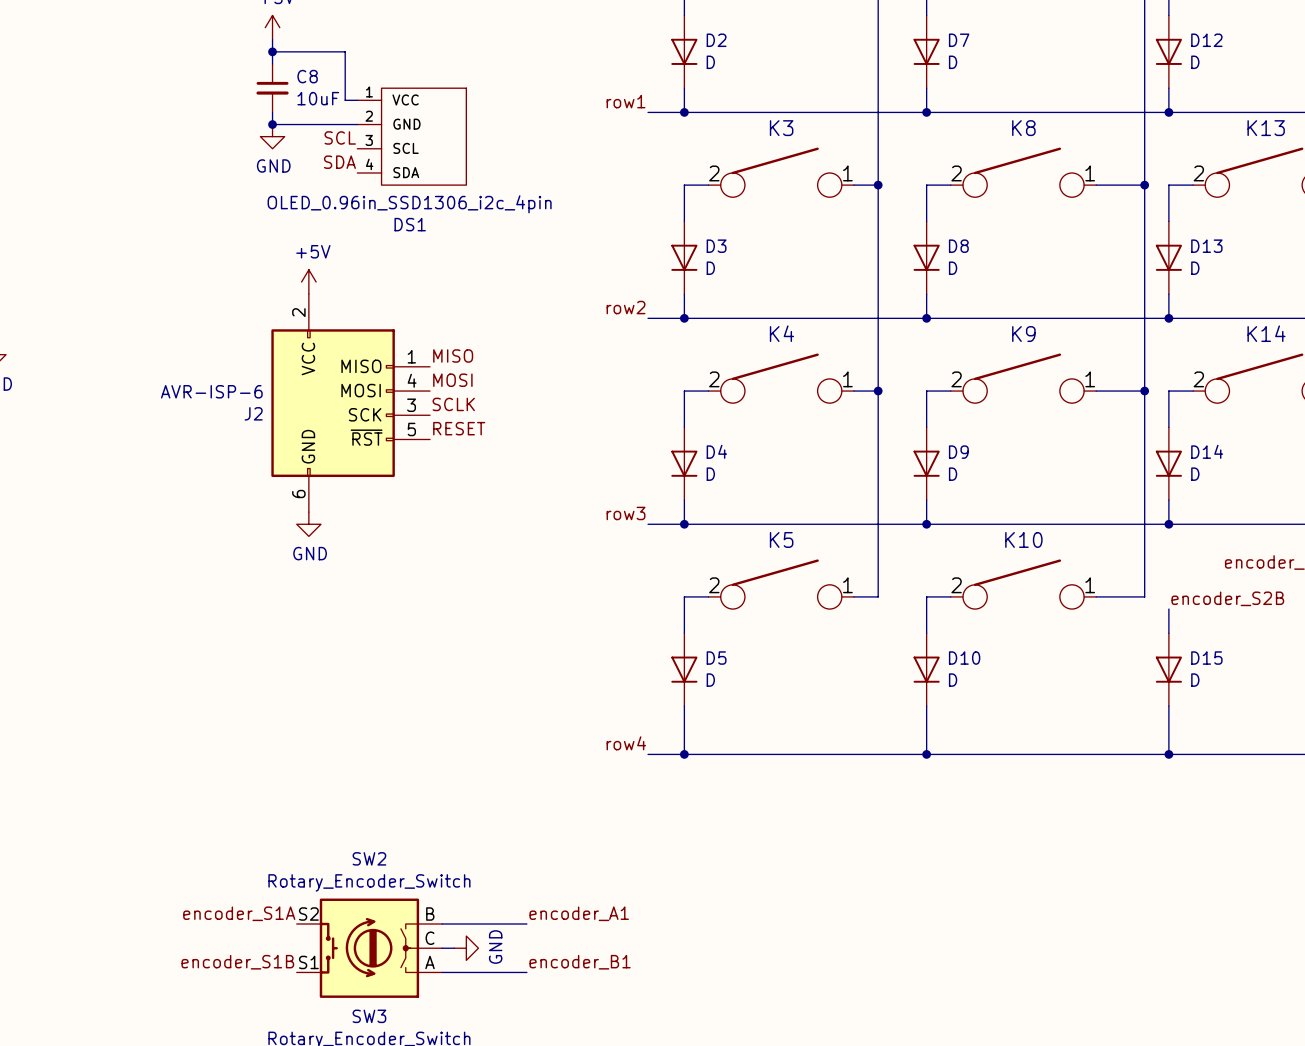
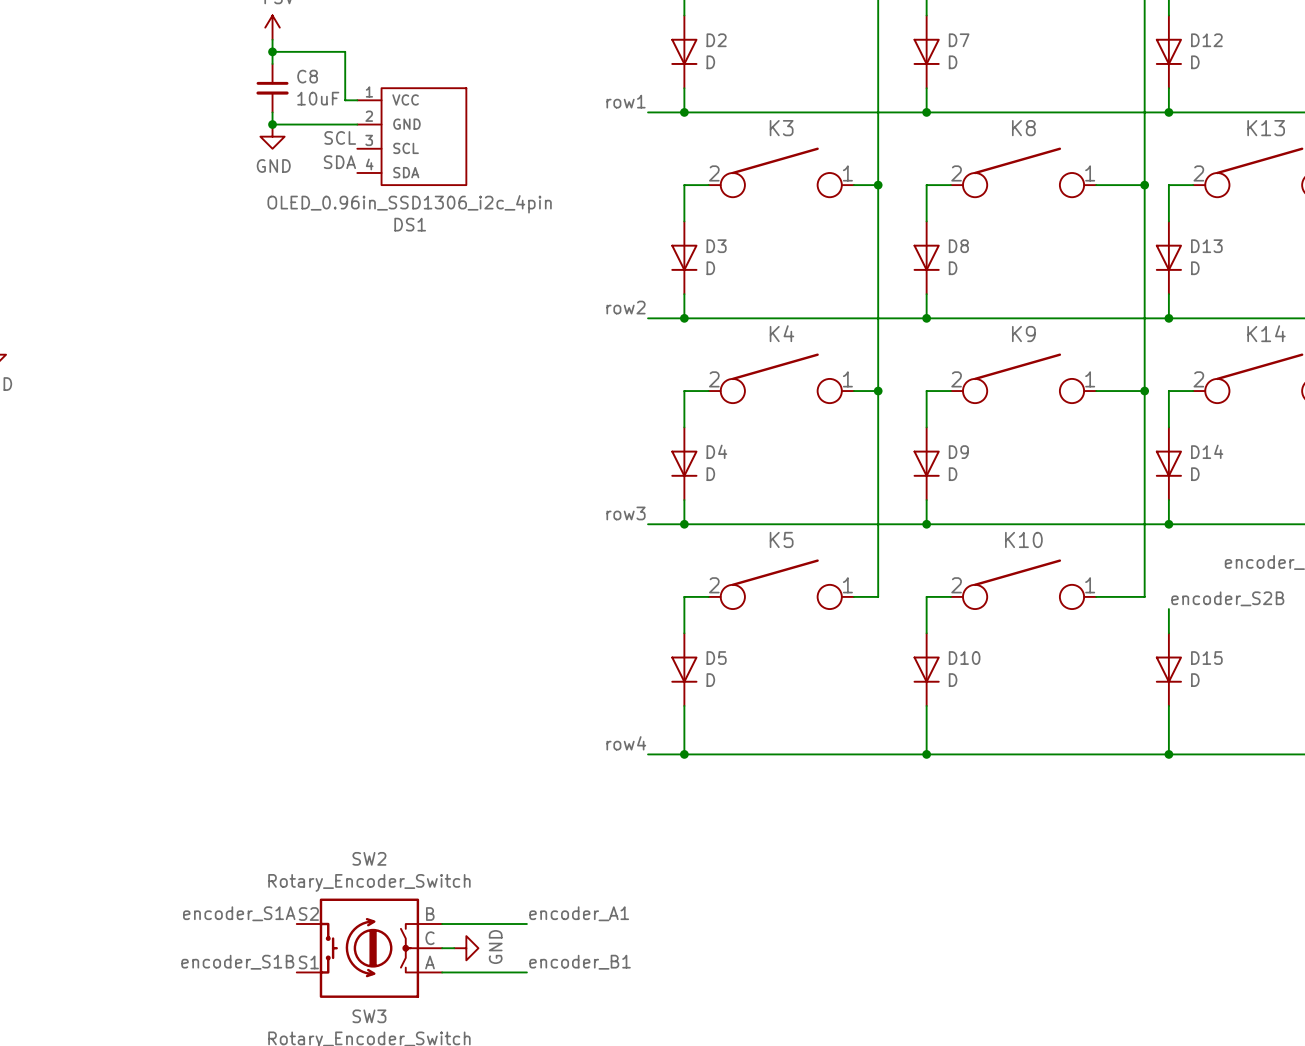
power symbol: +5V (308, 282) -> none
label: MISO (453, 355) -> none
label: MOSI (452, 380) -> none
J2: AVR-ISP-6 (350, 403) -> none
label: SCLK (453, 404) -> none
label: RESET (459, 428) -> none
power symbol: GND (308, 524) -> none

